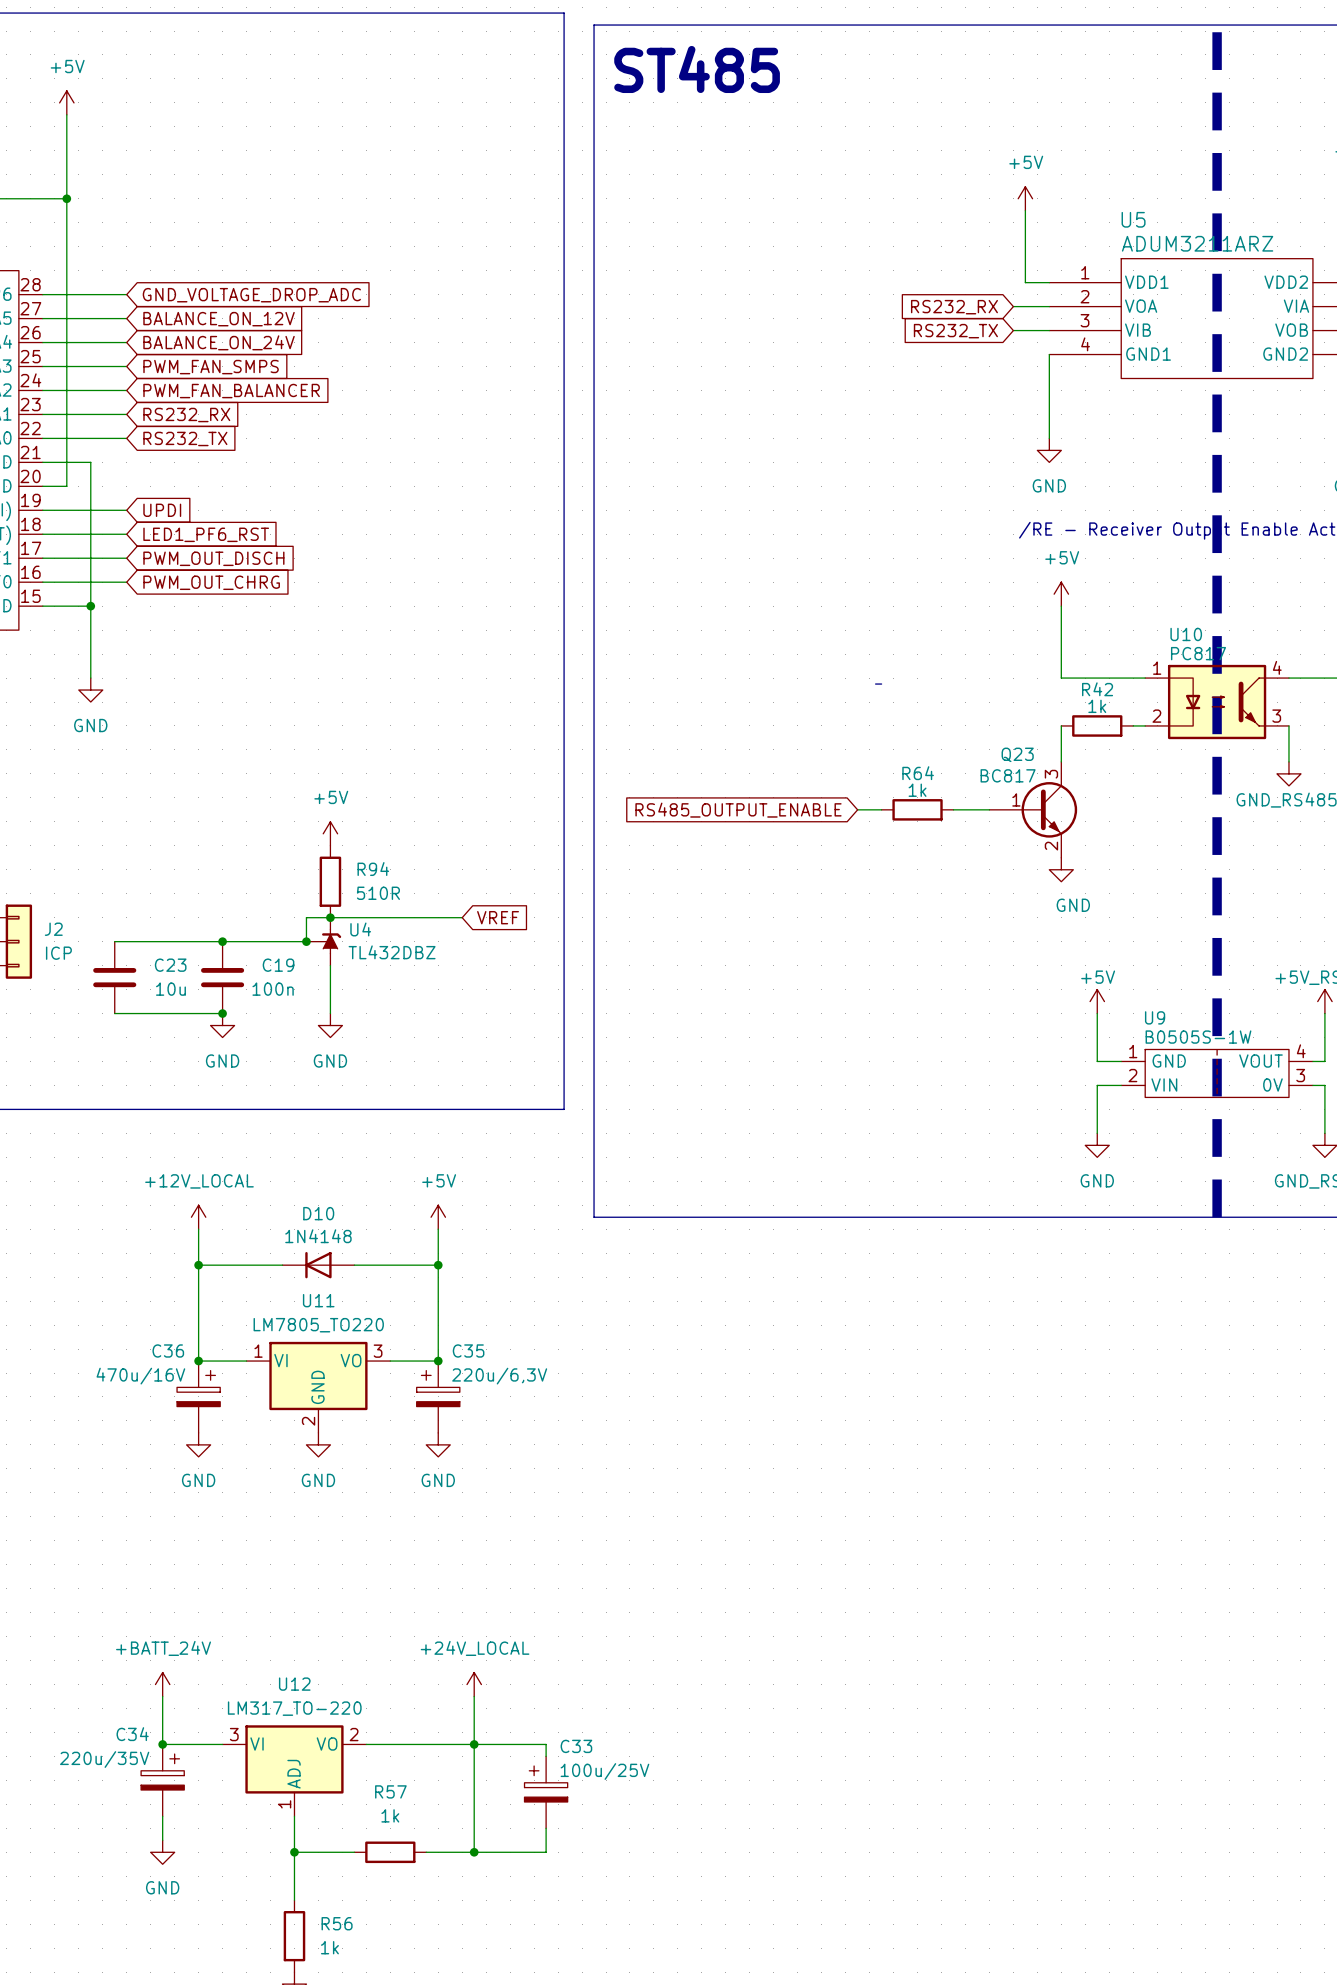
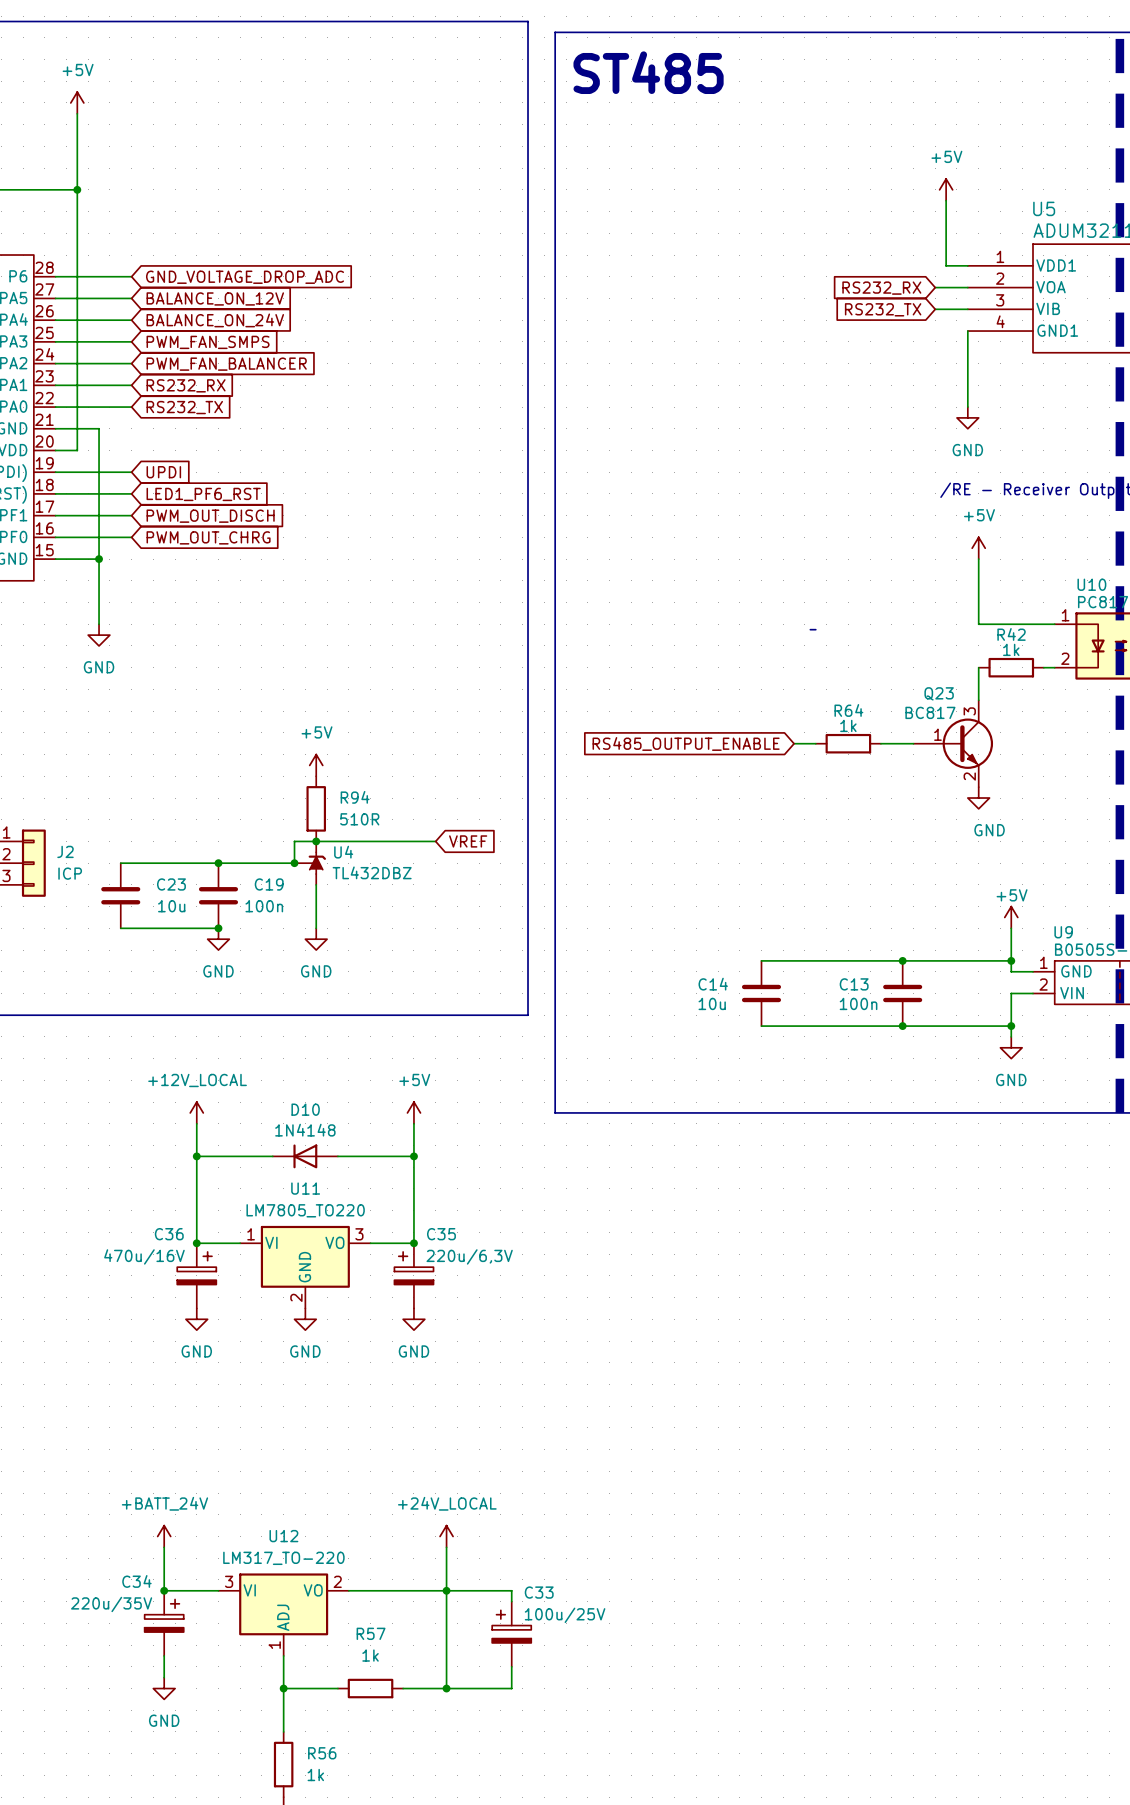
wire: none -> (761, 960) (1011, 960)
junction: none -> (902, 960)
junction: none -> (1011, 960)
C14: none -> 10u (761, 993)
C13: none -> 100n (902, 993)
wire: none -> (761, 1026) (1011, 1026)
junction: none -> (902, 1026)
junction: none -> (1011, 1026)

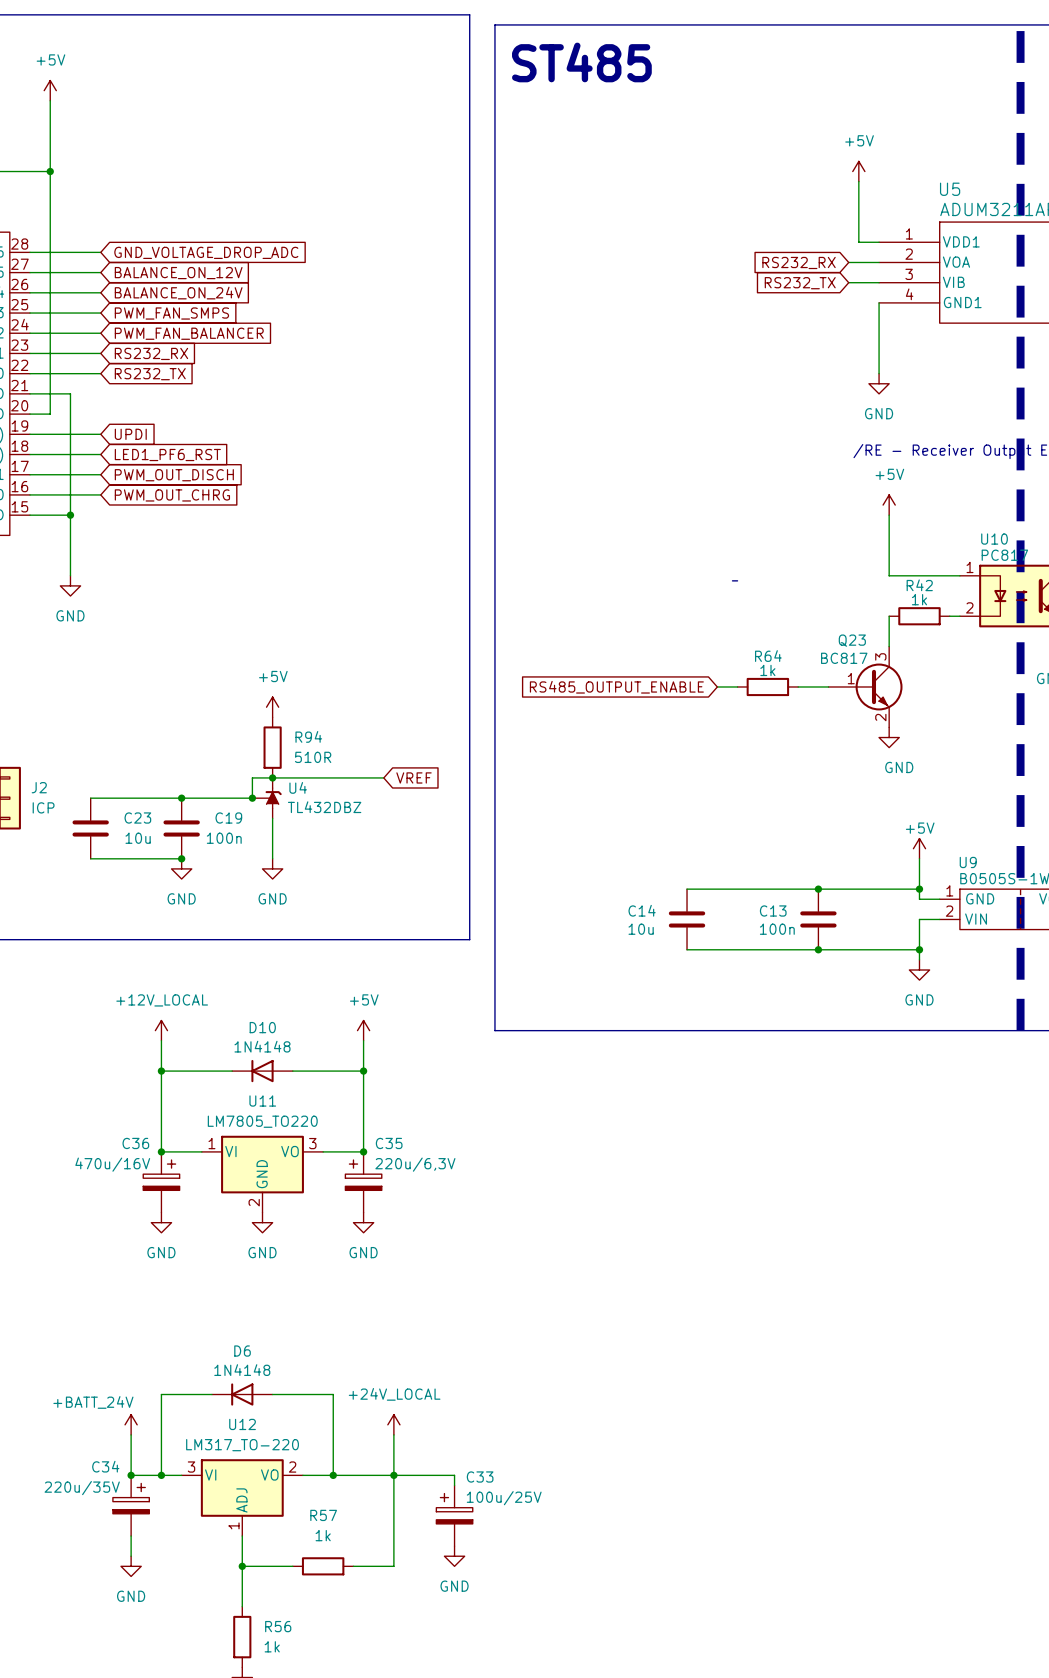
power symbol text position: +BATT_24V (164, 1503) -> +BATT_24V (93, 1402)
wire: none -> (211, 1394) (161, 1394) (161, 1475)
D6: none -> 1N4148 (242, 1394)
wire: none -> (272, 1394) (333, 1394) (333, 1475)
junction: none -> (161, 1475)
junction: none -> (333, 1475)
wire: (511, 1666) (511, 1688) (446, 1688) -> none
power symbol: none -> GND (454, 1556)
junction: (446, 1688) -> none

